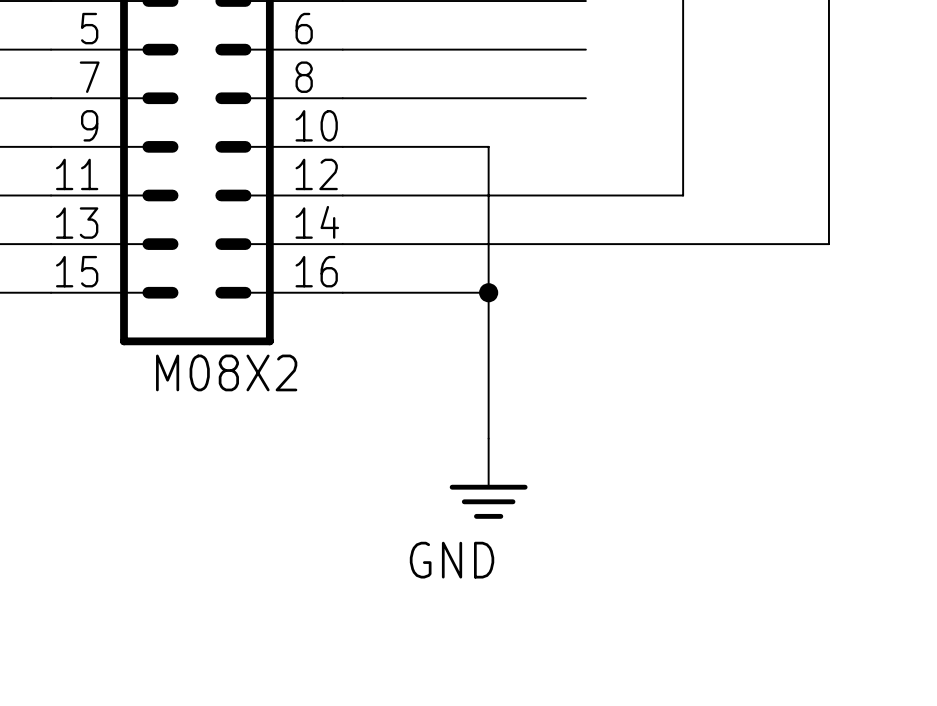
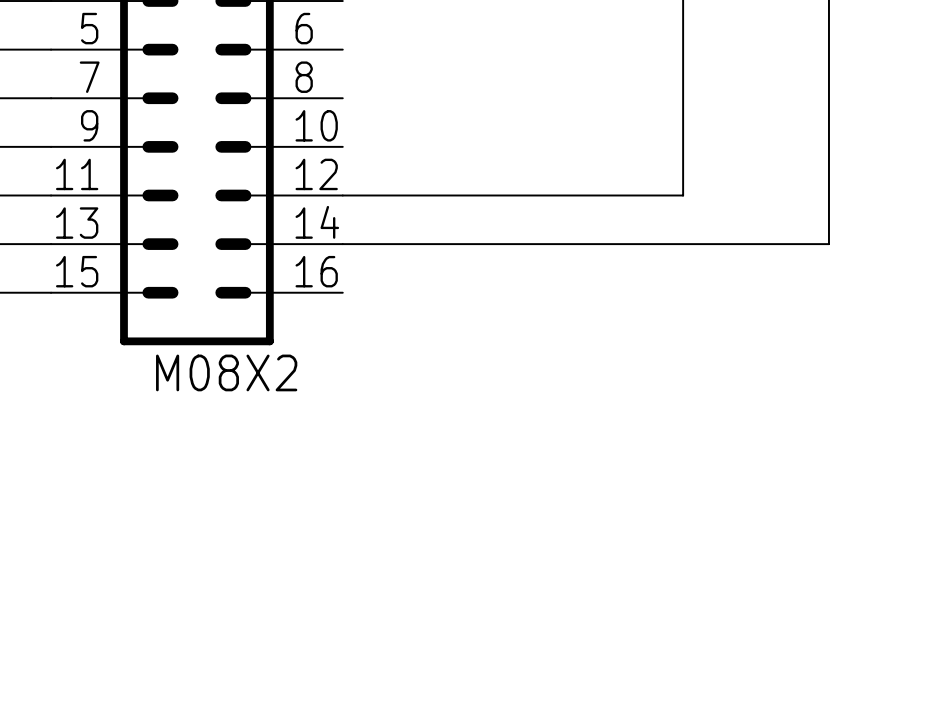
wire: (342, 1) (585, 1) -> none
wire: (342, 49) (585, 49) -> none
wire: (342, 98) (585, 98) -> none
wire: (342, 146) (488, 146) (488, 438) -> none
wire: (342, 292) (488, 292) -> none
junction: (488, 292) -> none
power symbol: GND (488, 478) -> none

